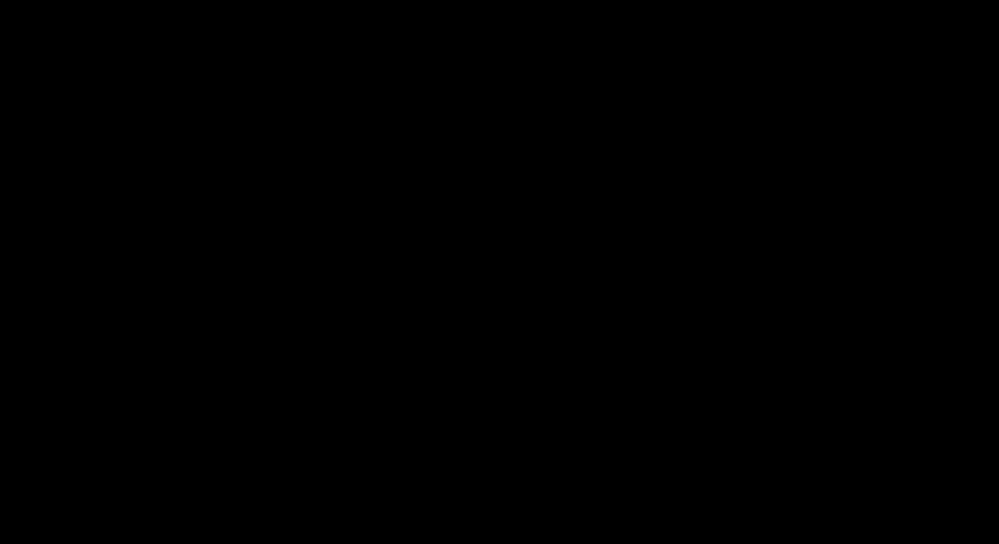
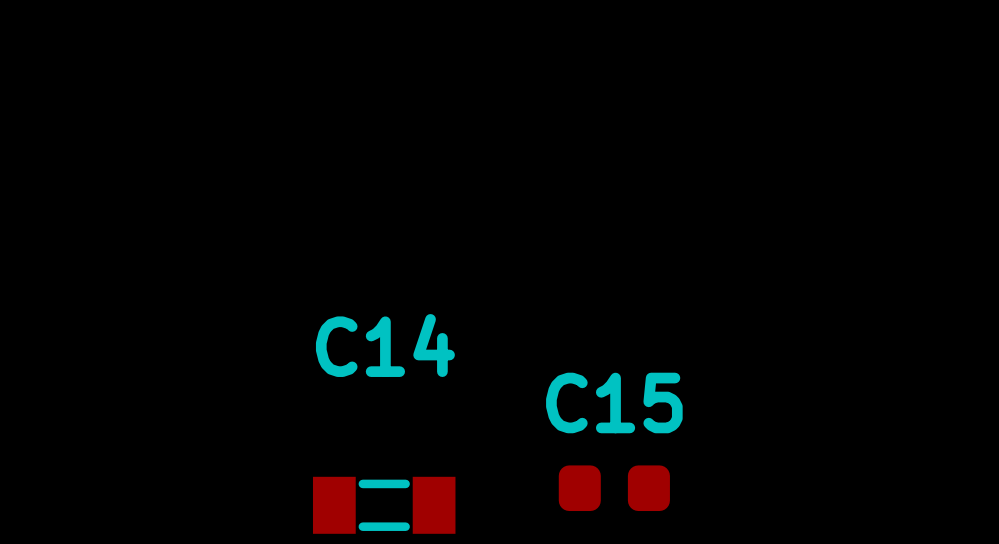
C15: none -> (614, 488)
C14: none -> (384, 505)

